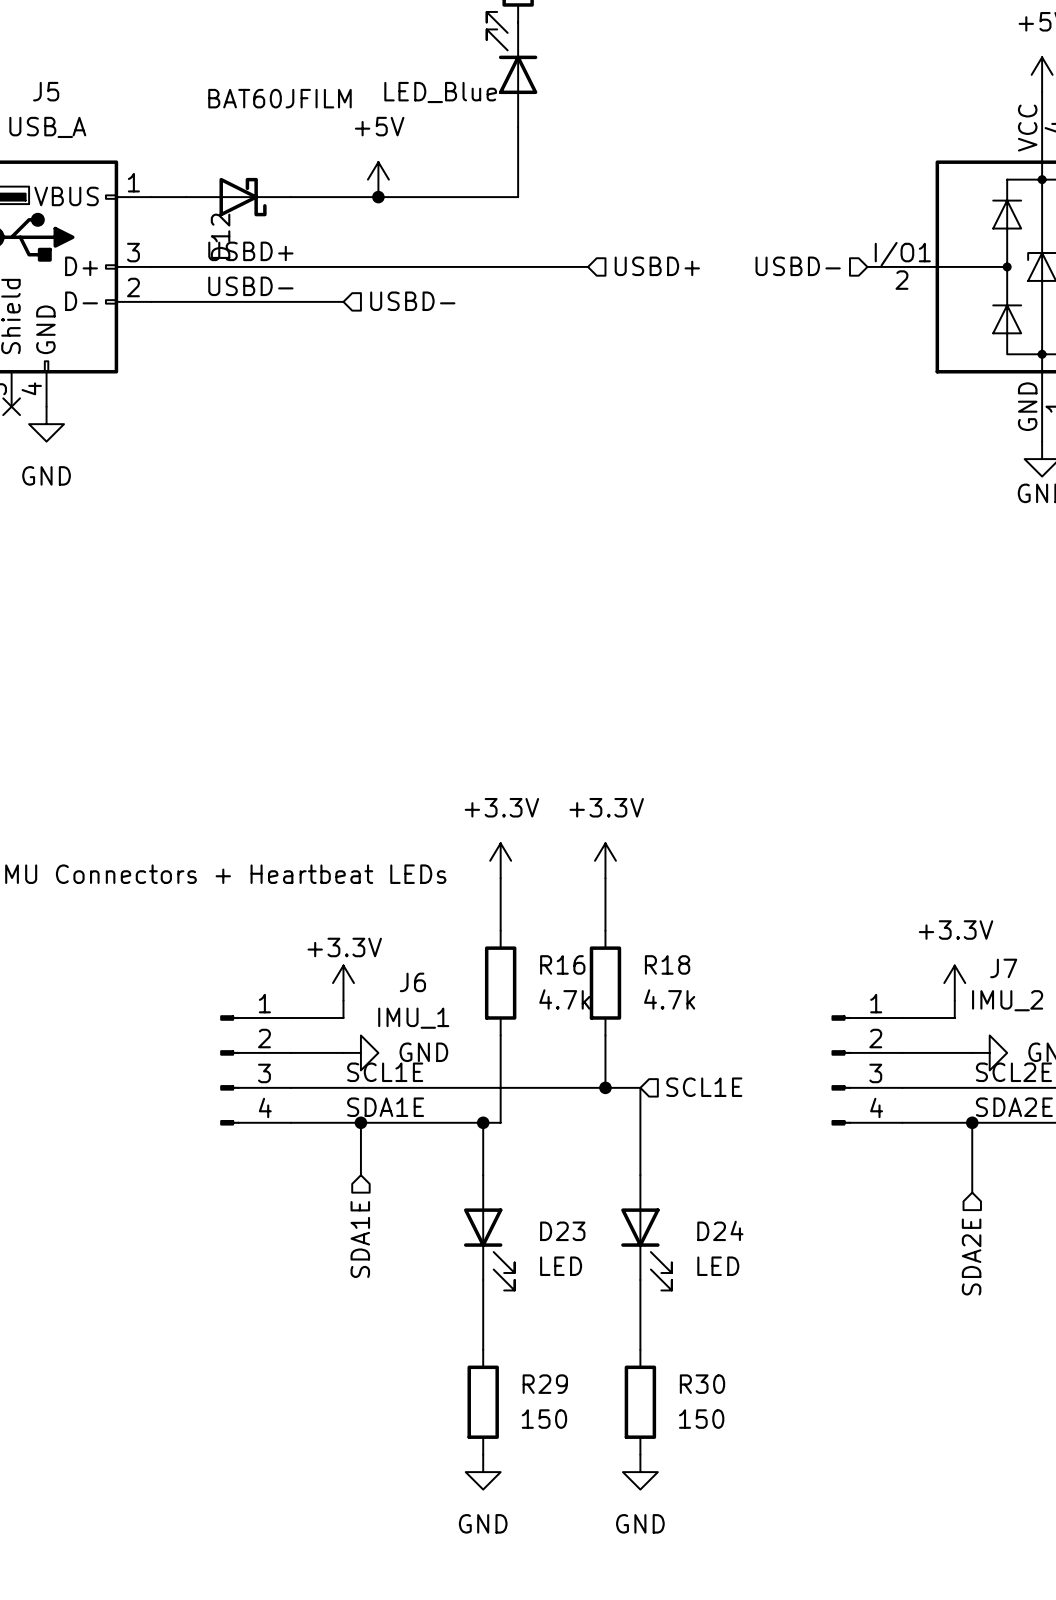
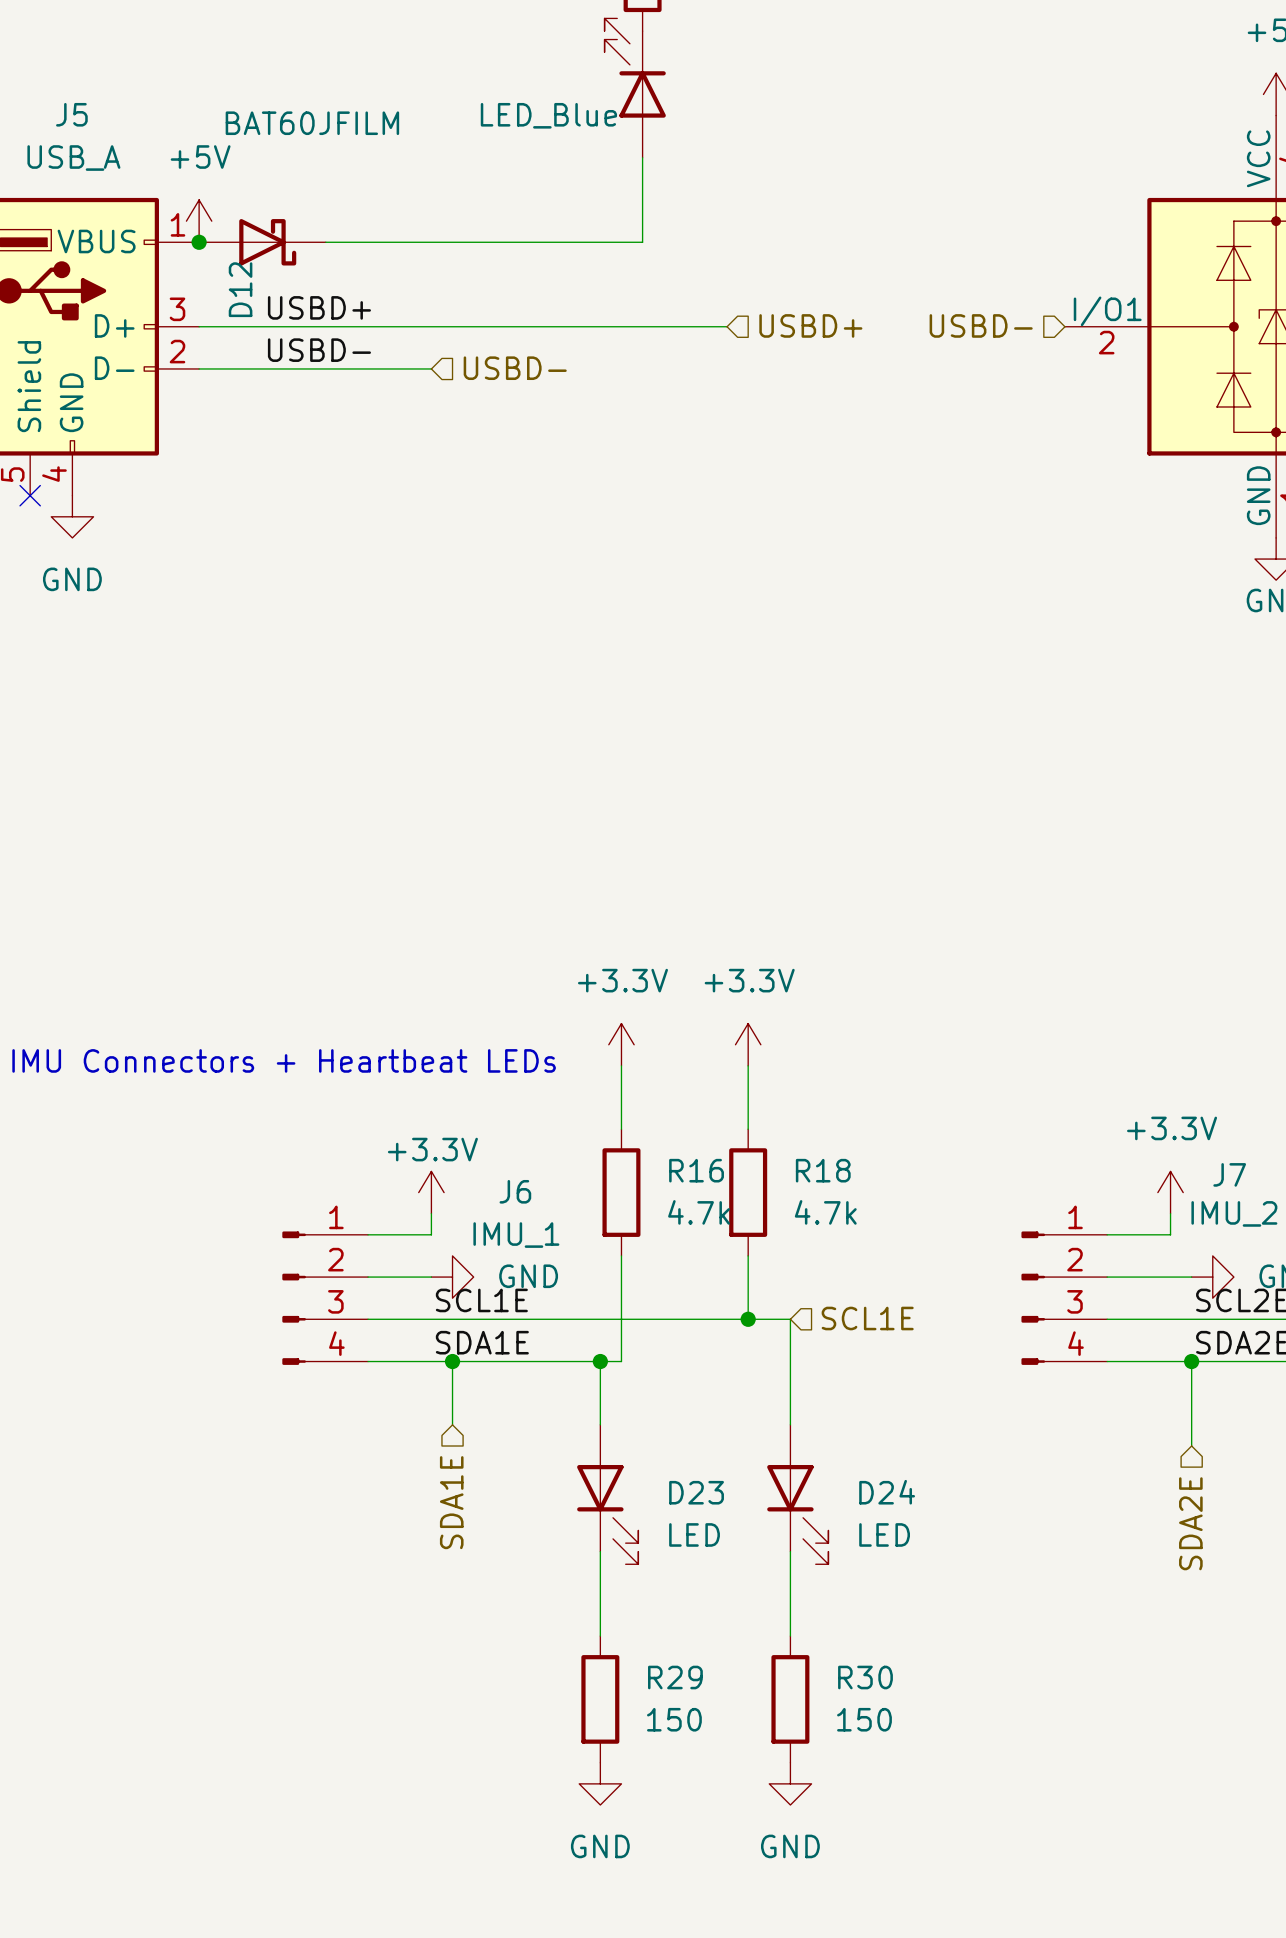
power symbol position: +5V (378, 179) -> +5V (199, 221)
junction: none -> (199, 242)
D12 position: (238, 197) -> (262, 242)
junction: (378, 197) -> none

